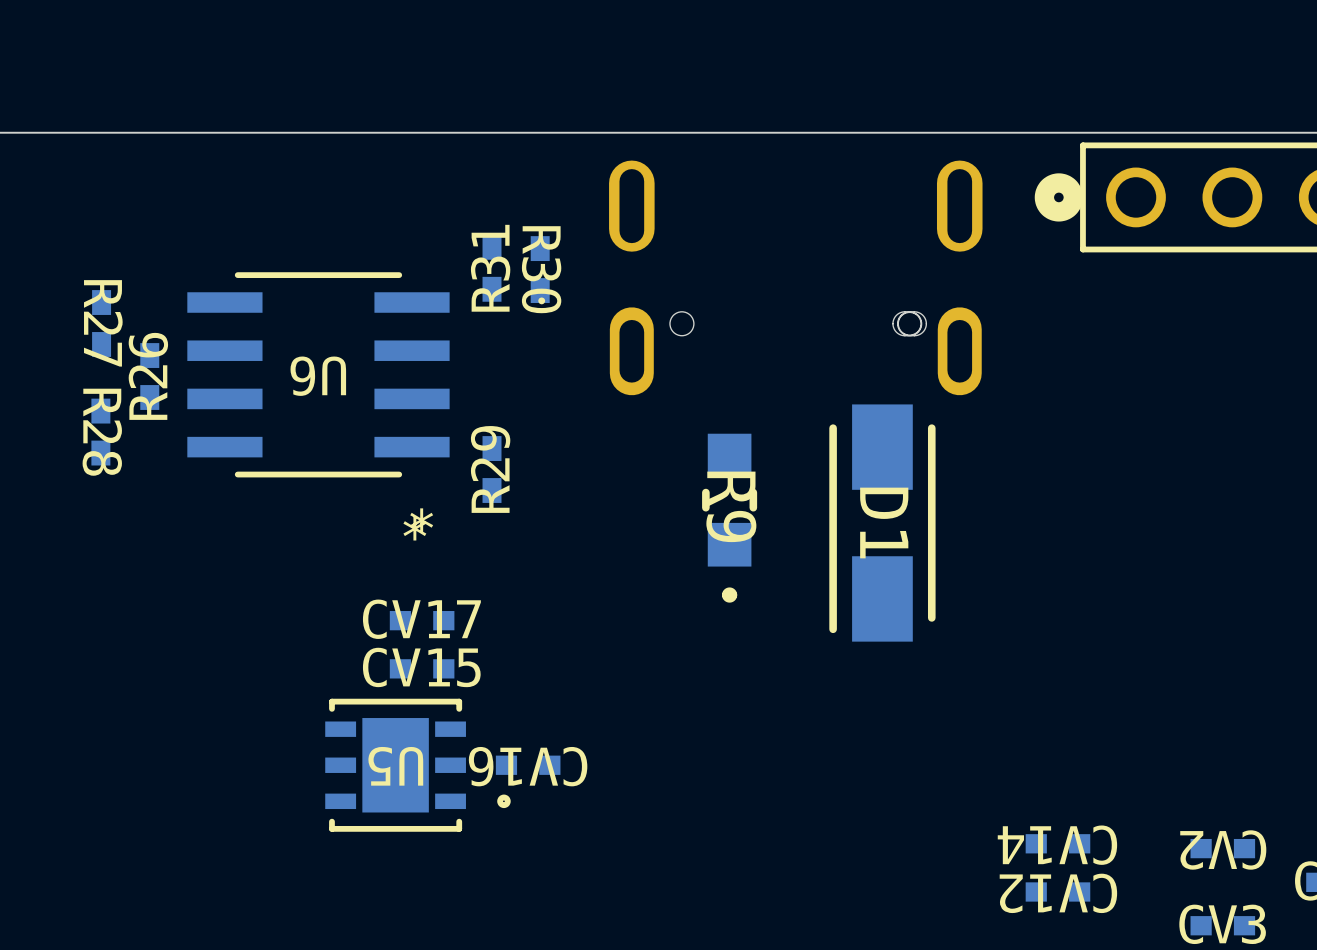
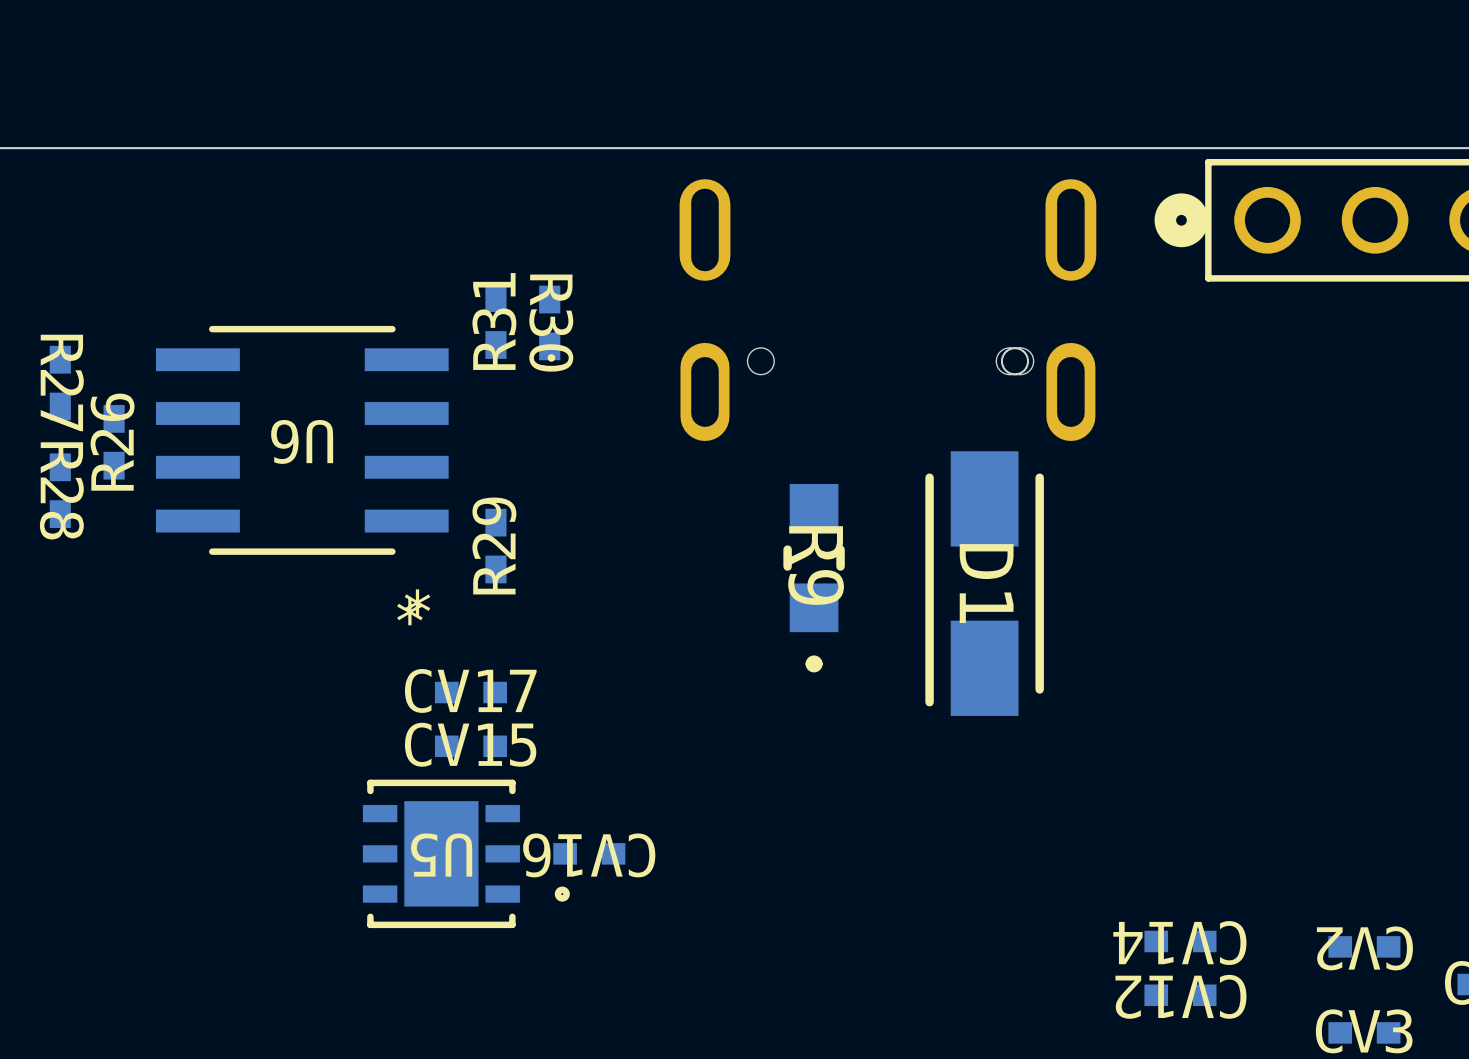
R31 position: (492, 268) -> (495, 321)
R30 position: (540, 269) -> (549, 322)
R27 position: (101, 323) -> (60, 383)
U6 position: (318, 374) -> (302, 440)
R26 position: (149, 376) -> (114, 442)
R28 position: (100, 432) -> (60, 490)
R29 position: (492, 469) -> (495, 546)

